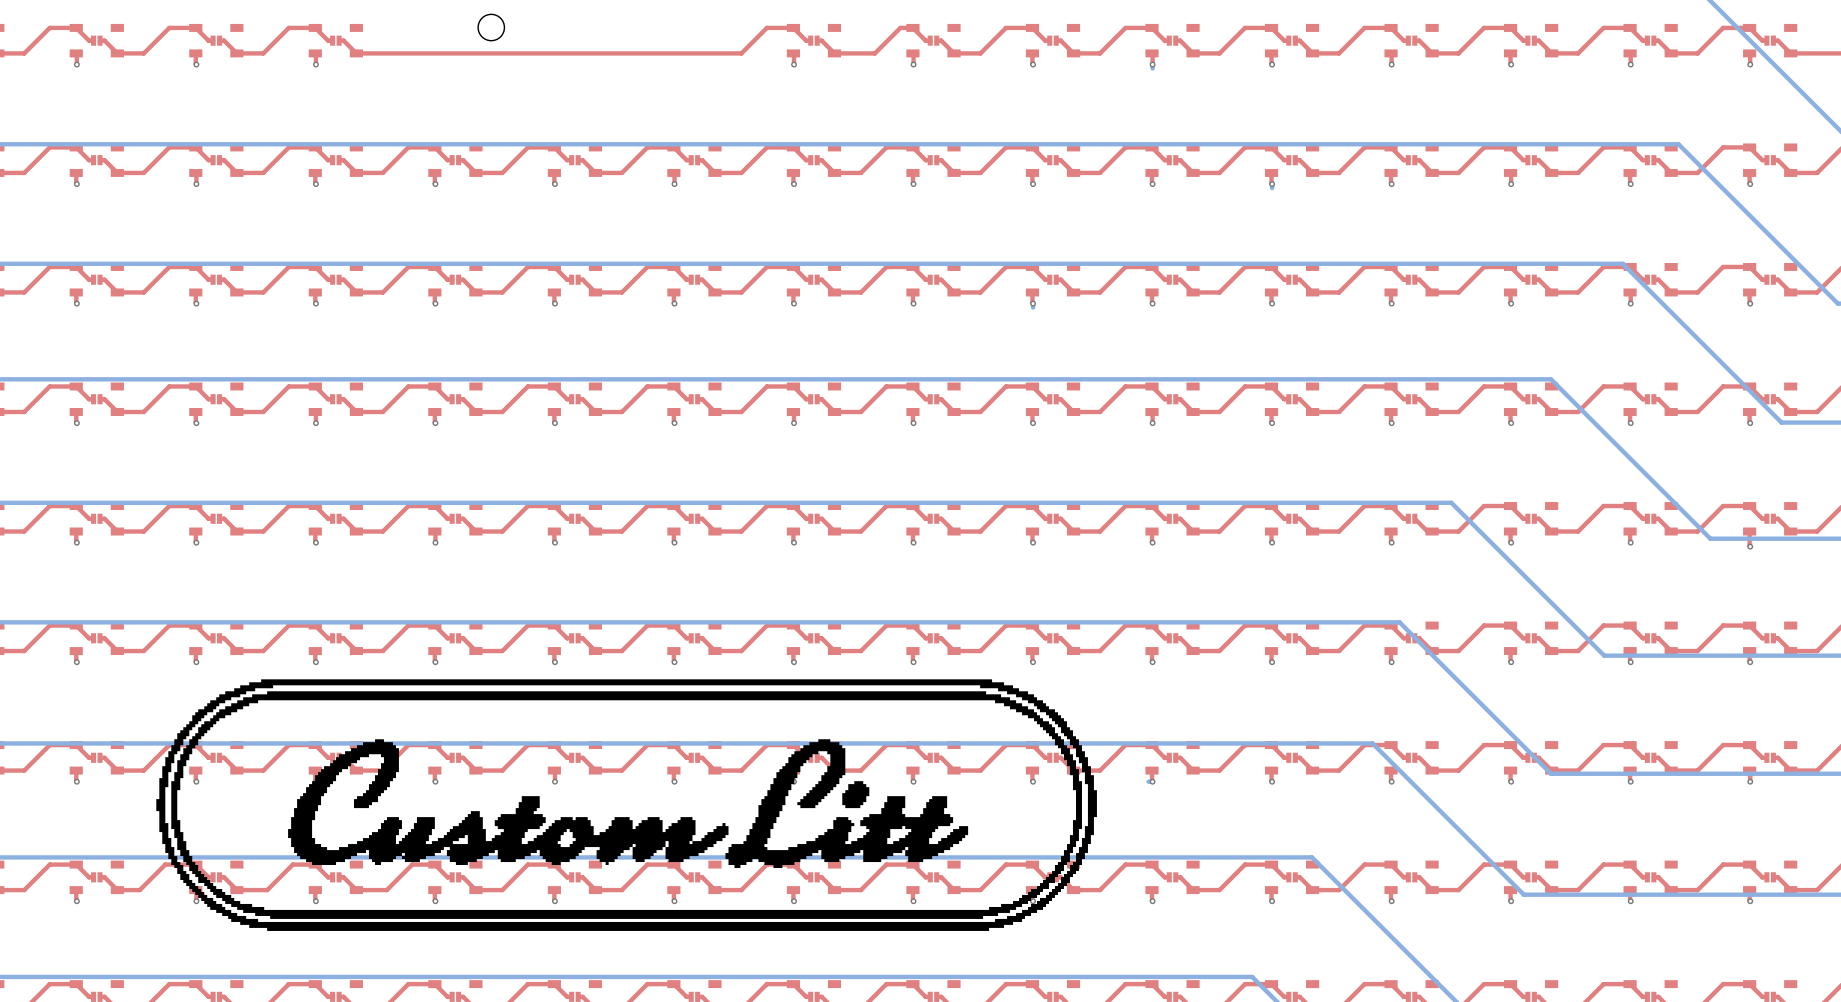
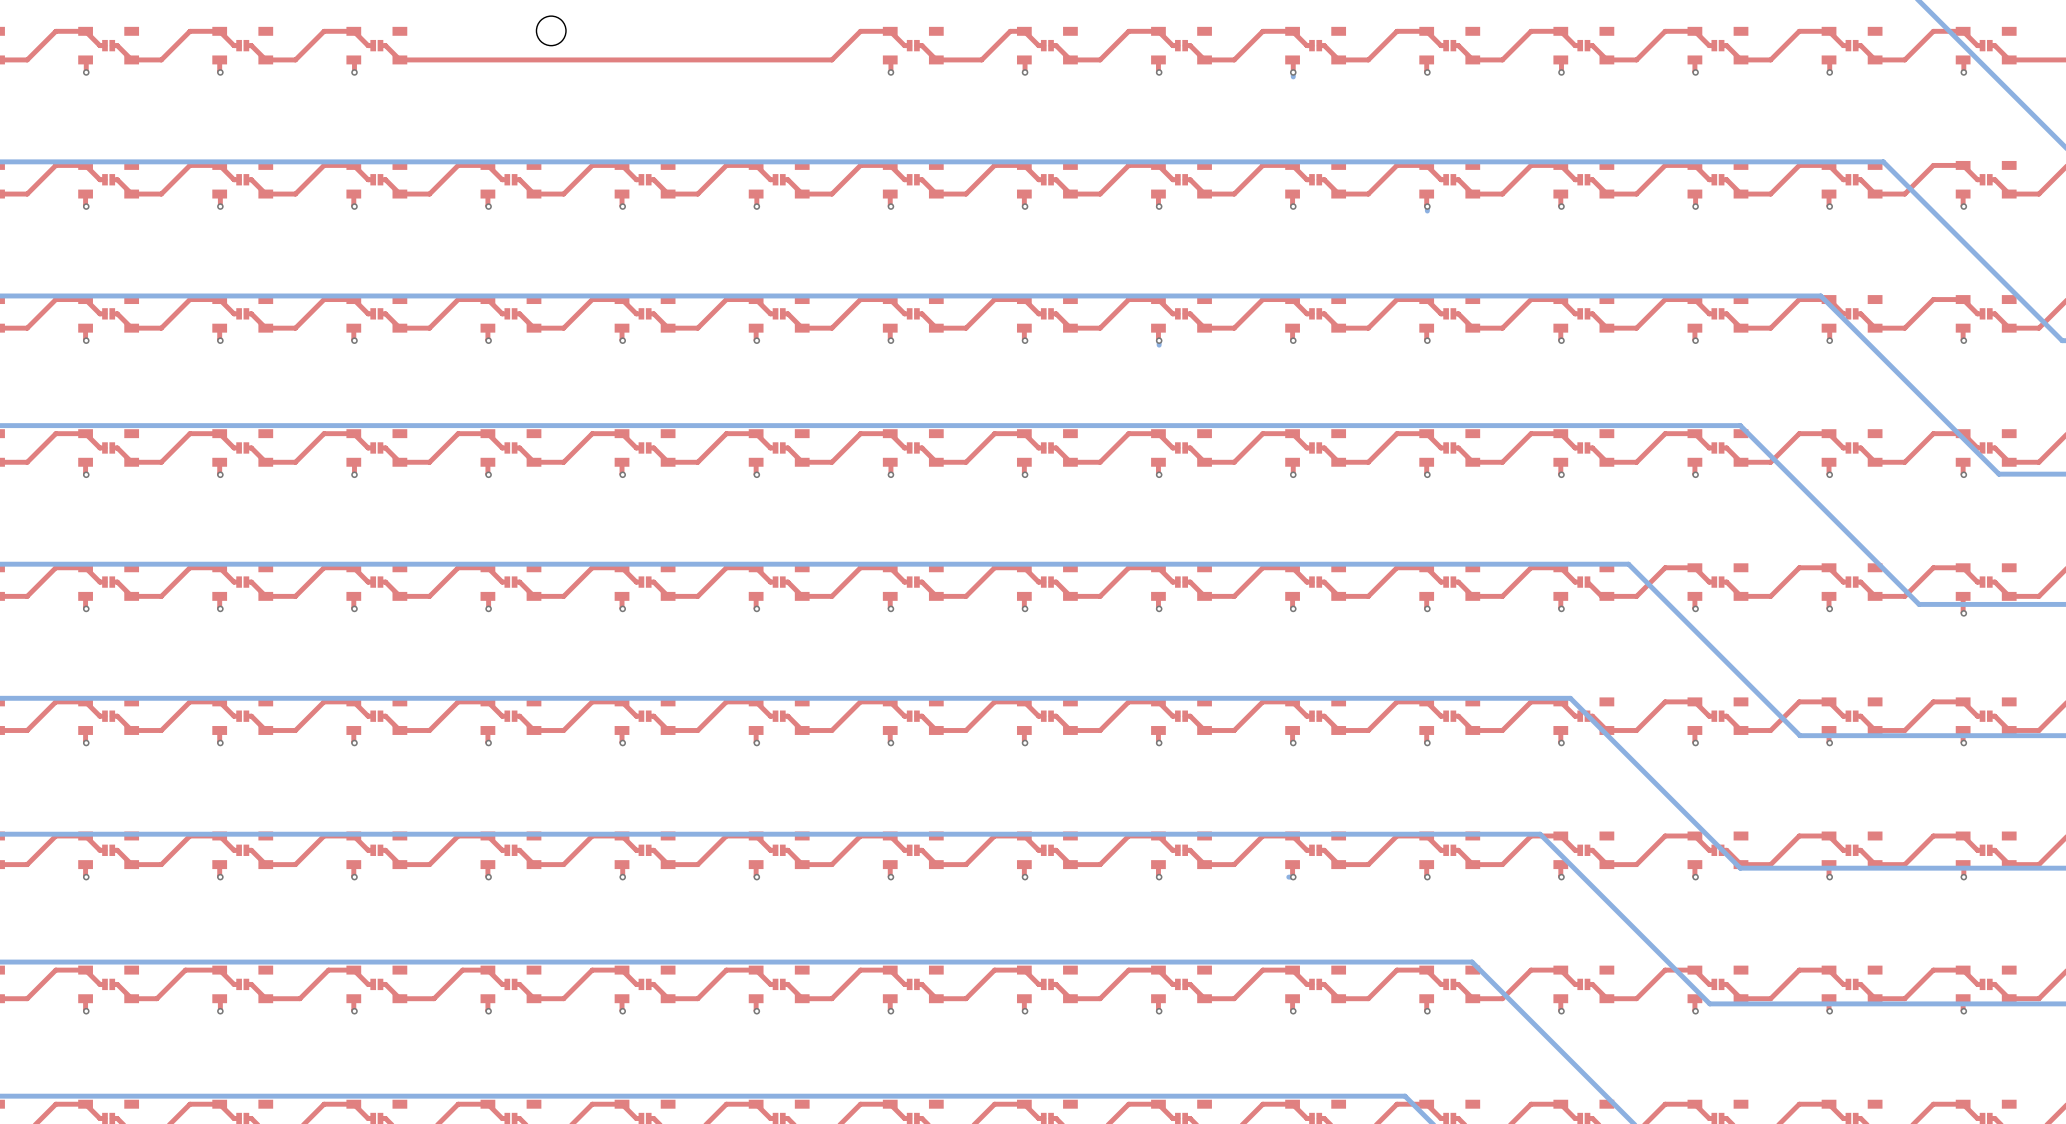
drawing: [156, 679, 1097, 931] -> none

